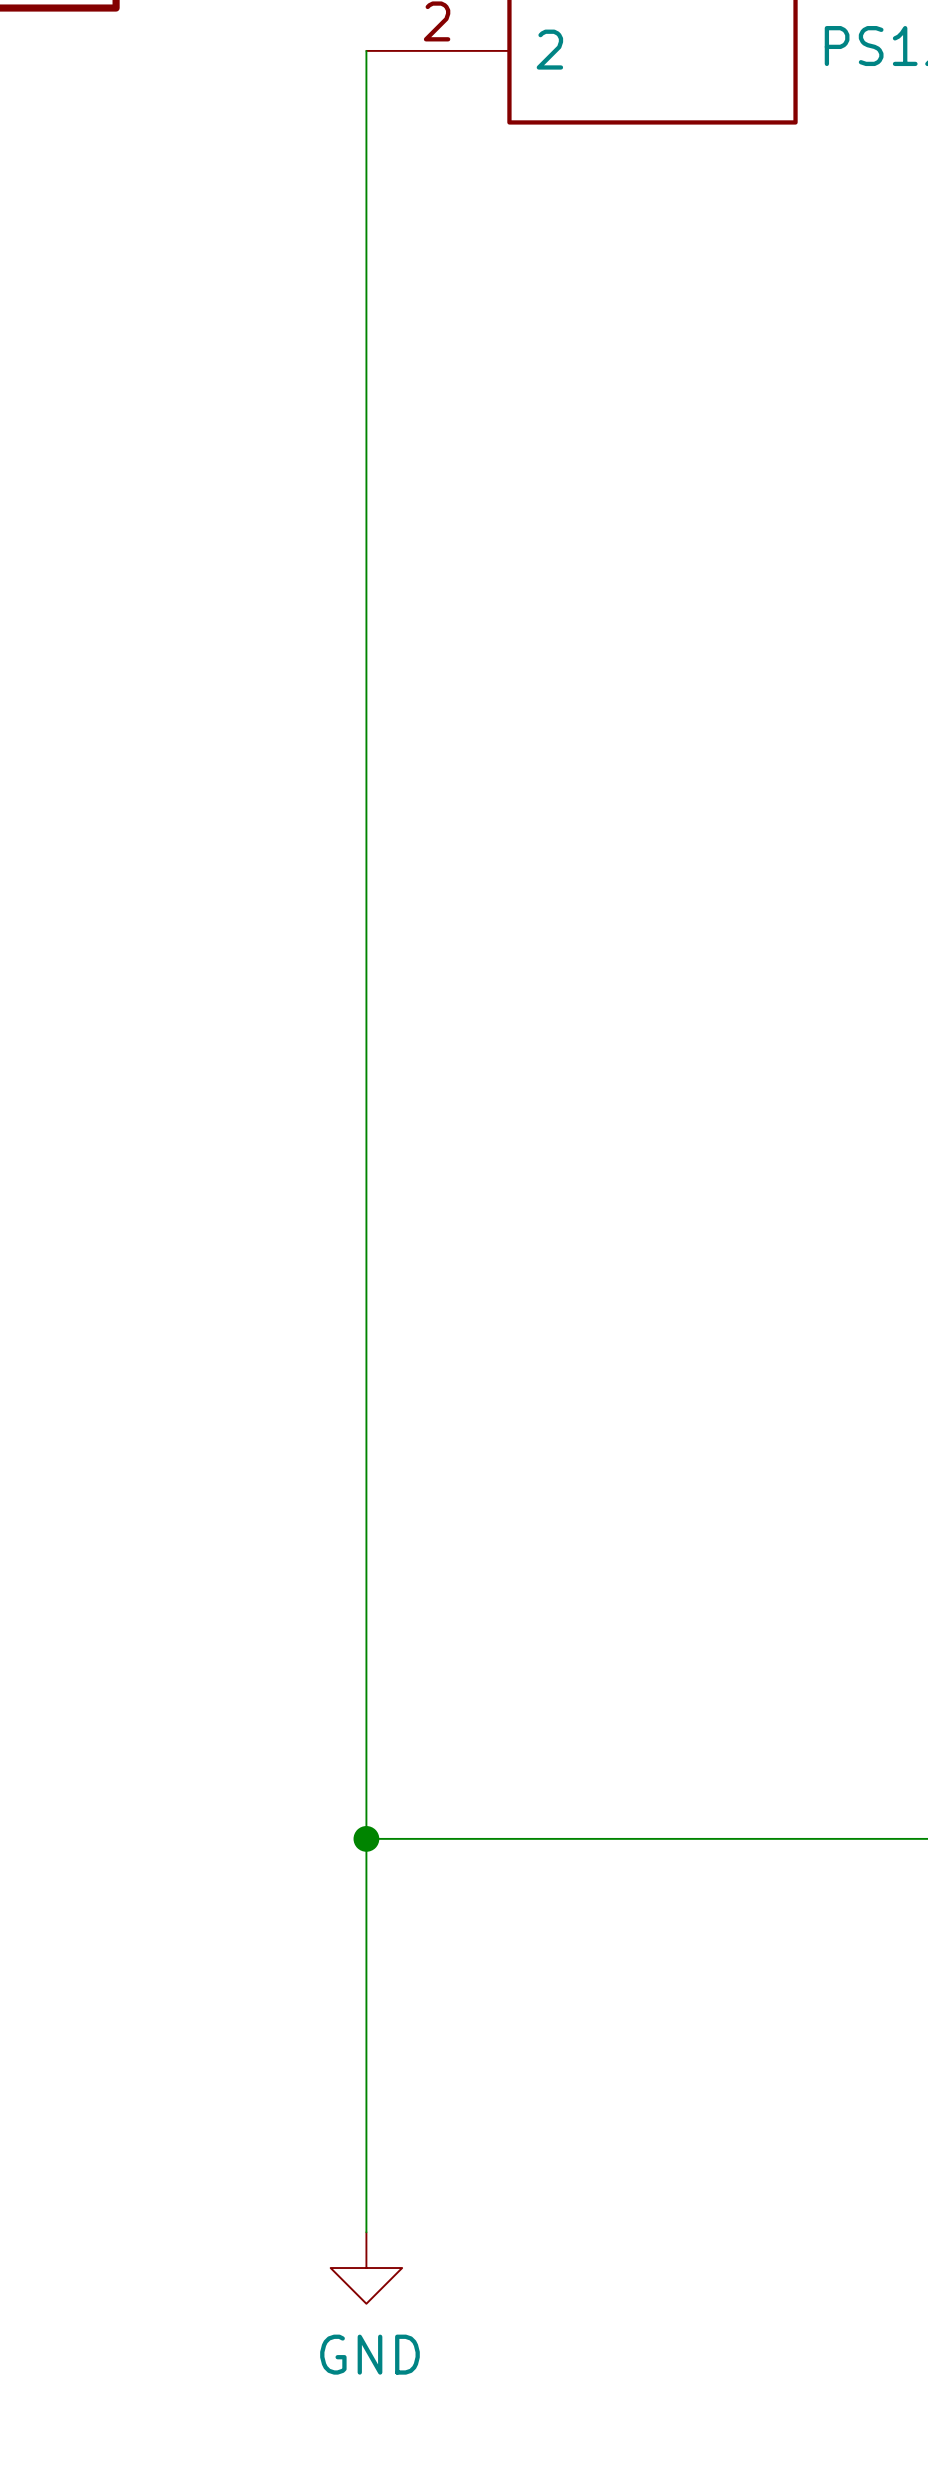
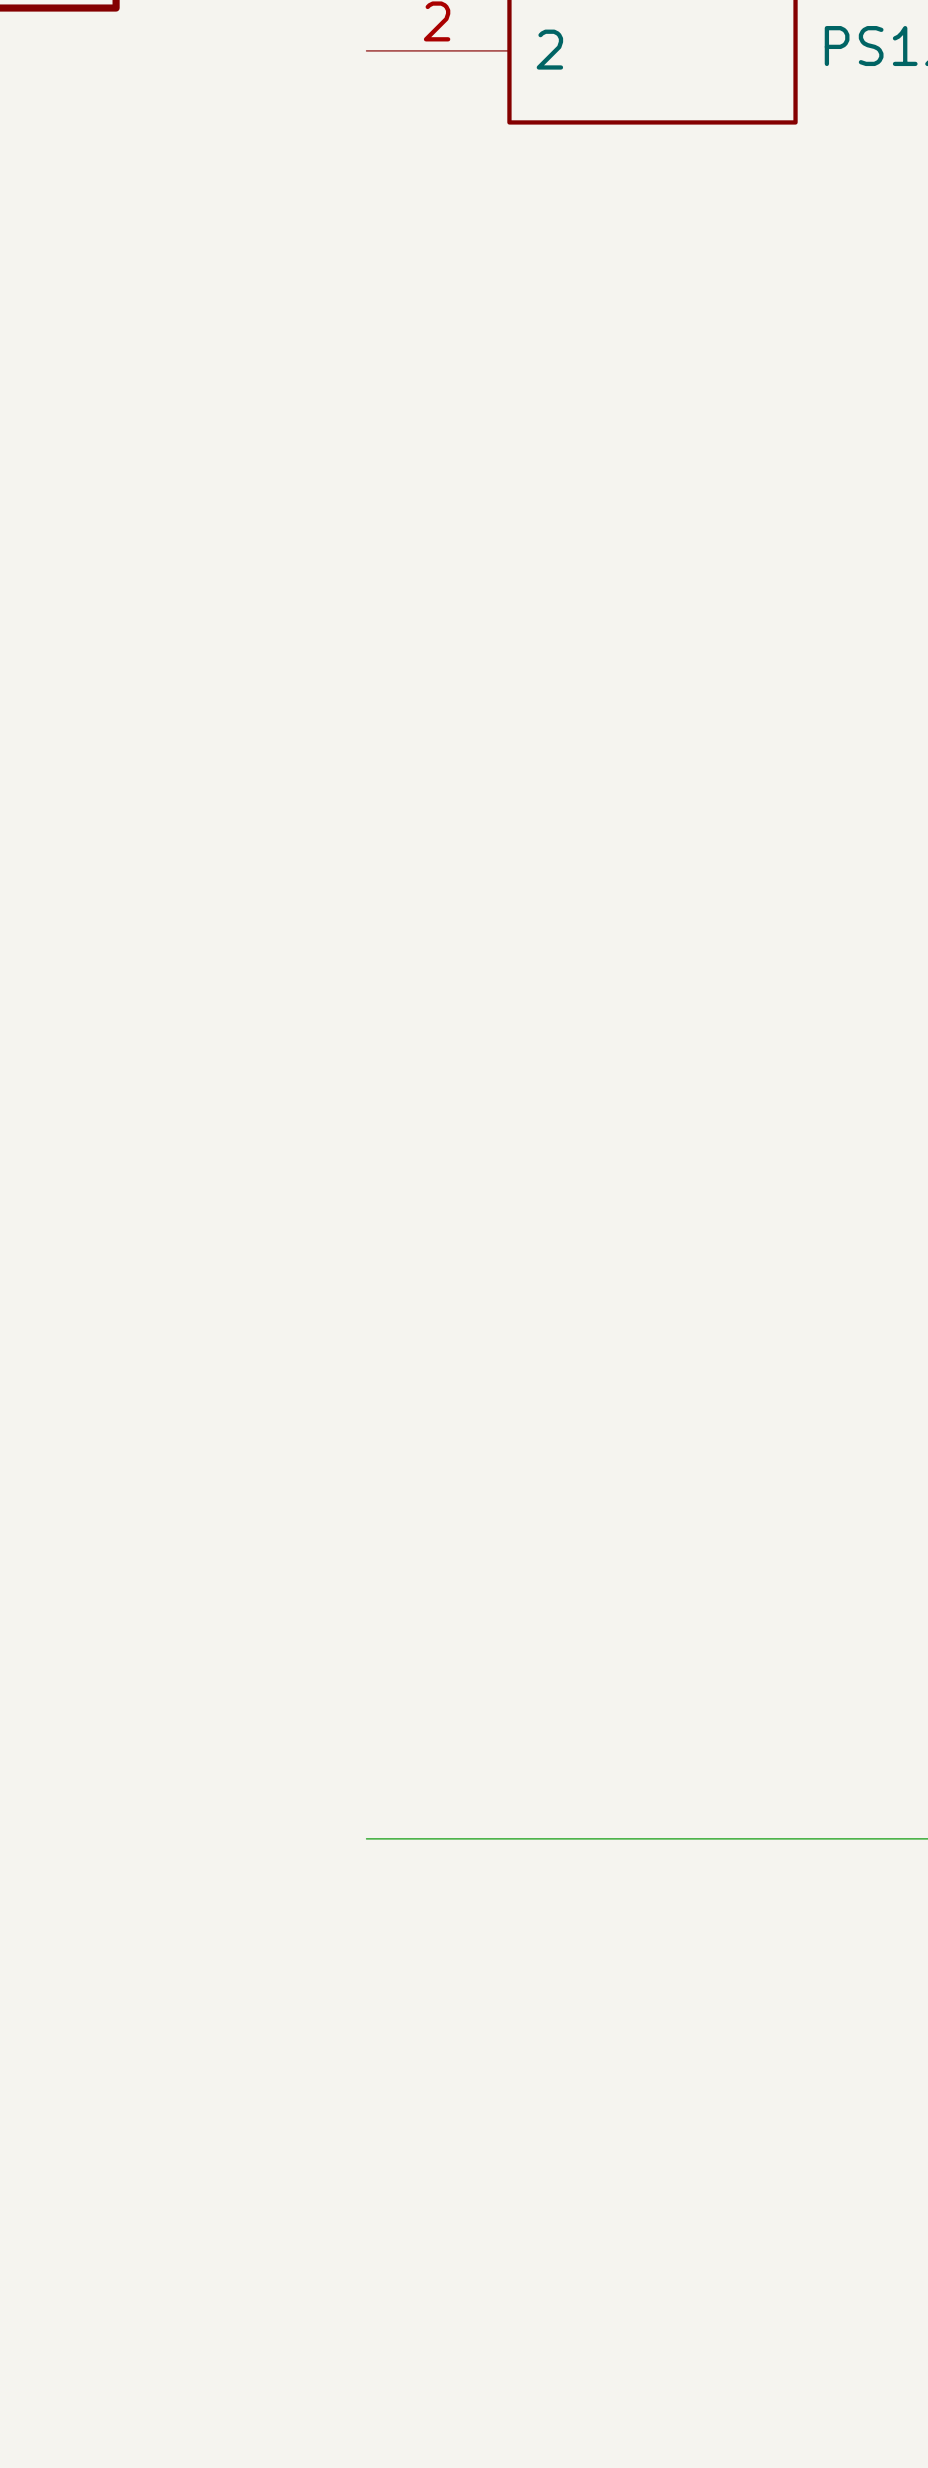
wire: (366, 50) (366, 2232) -> none
junction: (366, 1838) -> none
power symbol: GND (366, 2268) -> none

